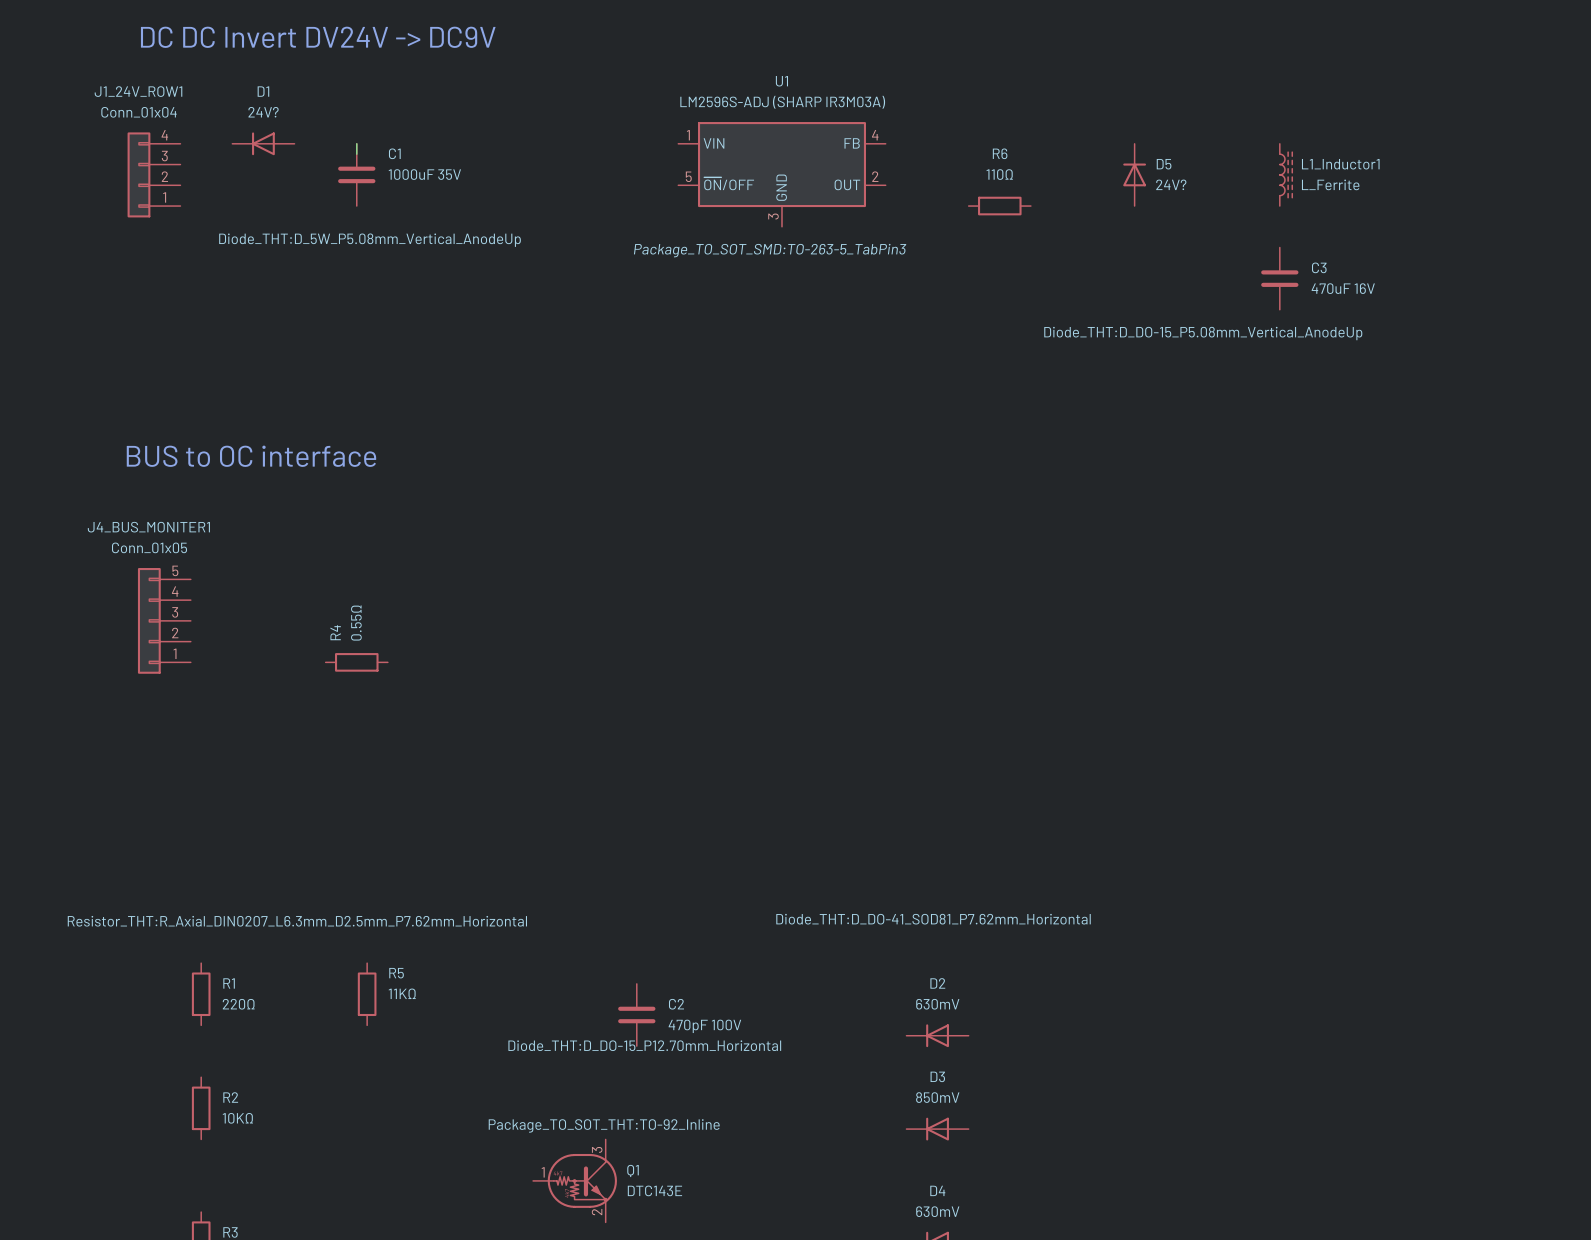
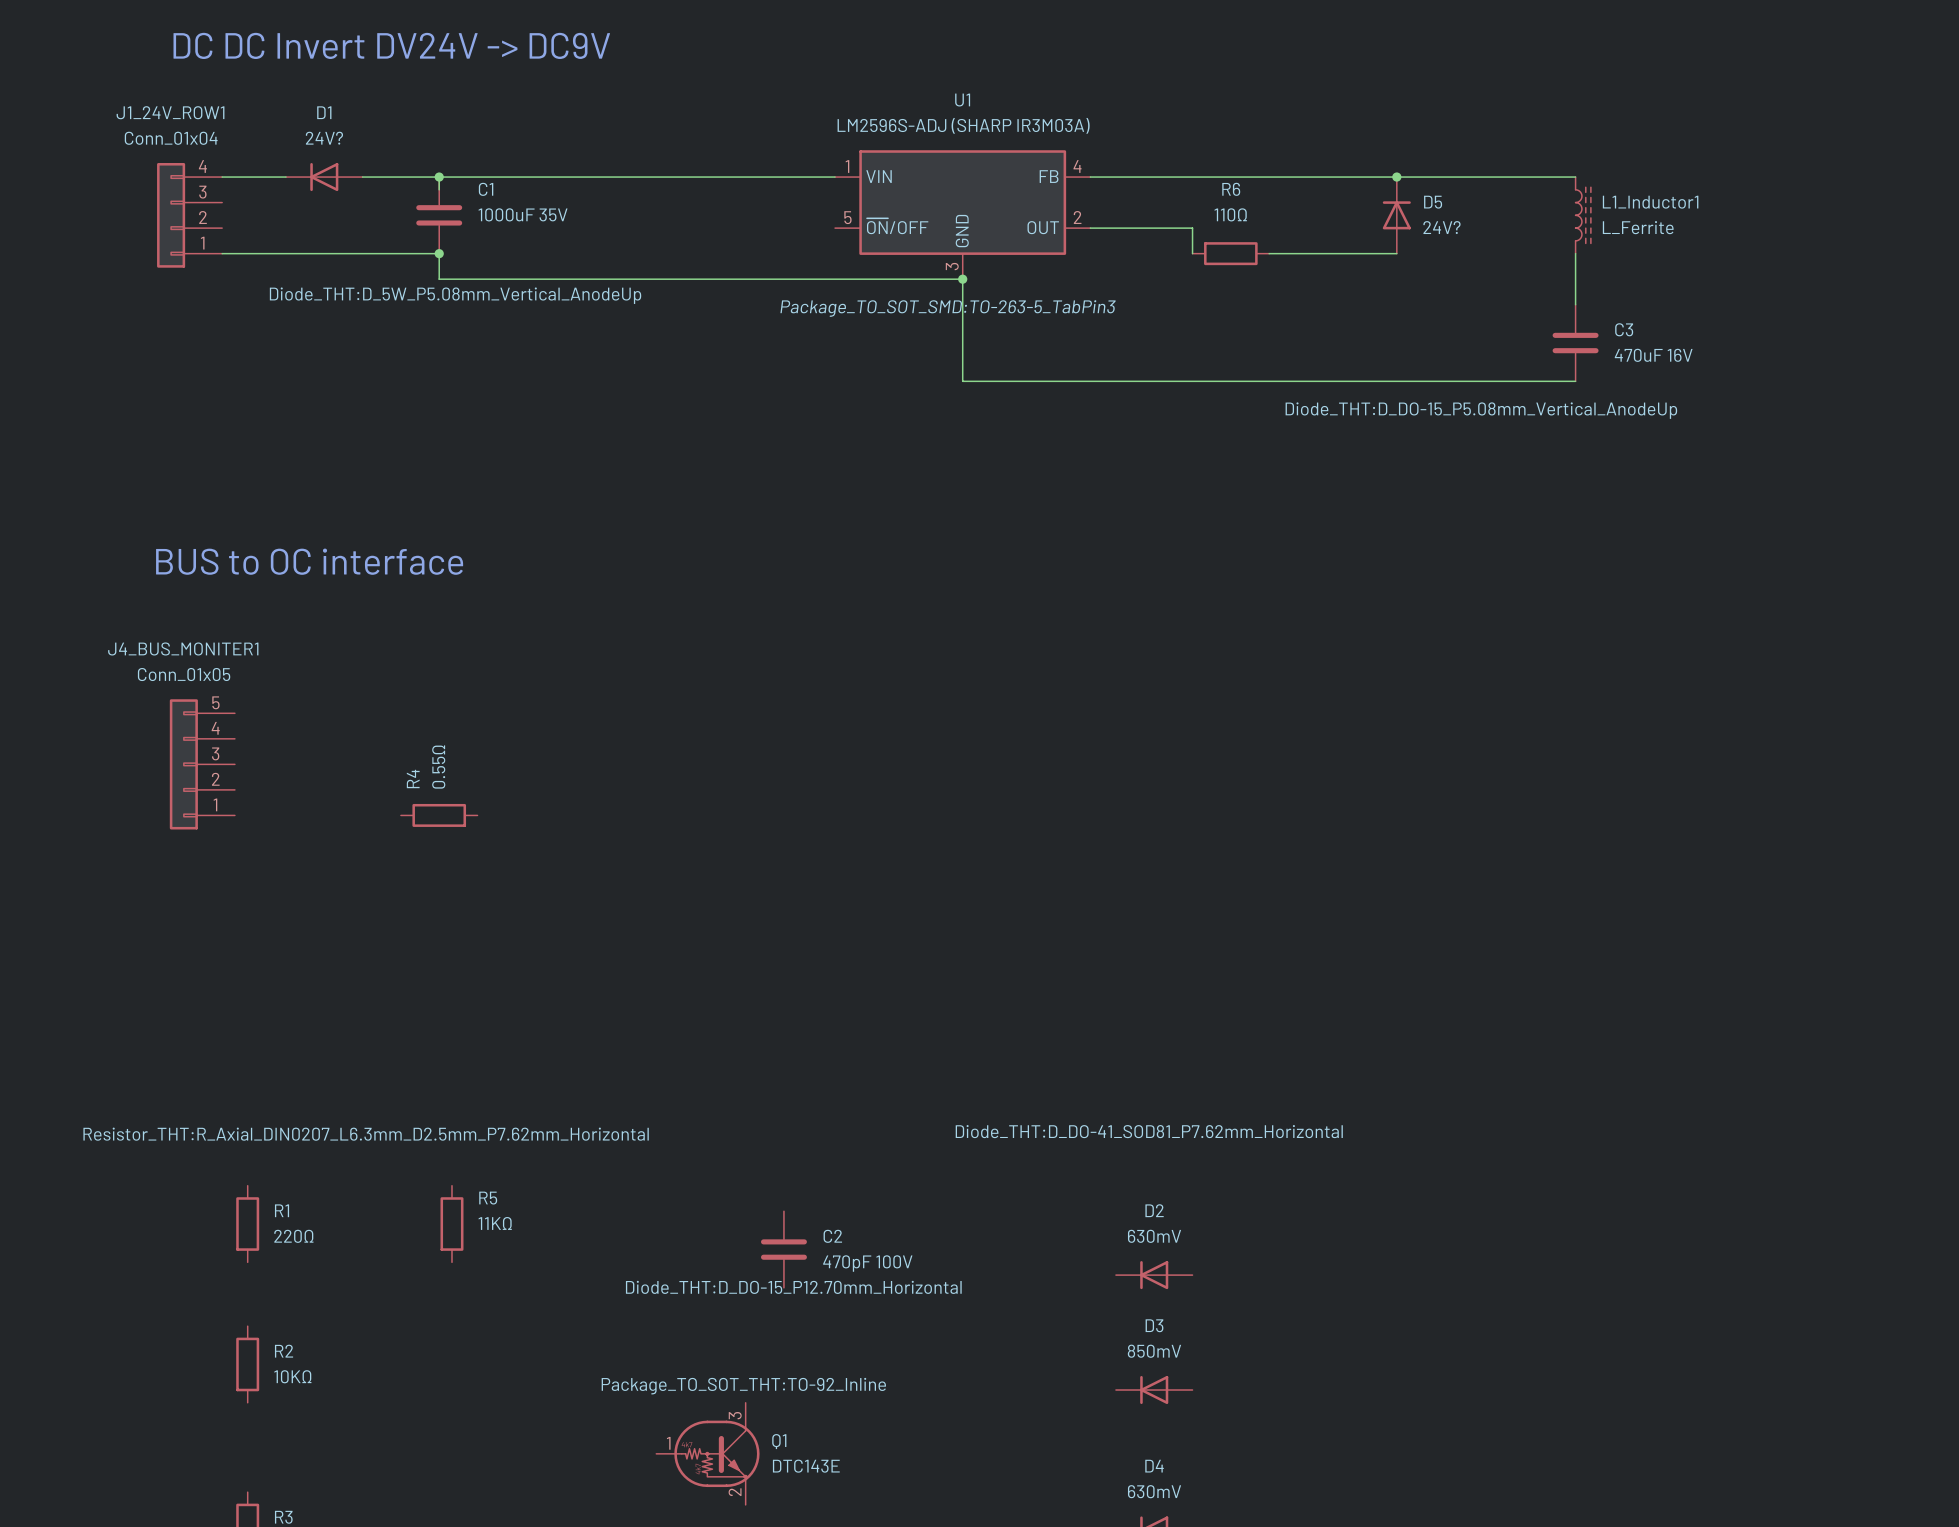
wire: none -> (222, 177) (286, 177)
wire: none -> (362, 177) (835, 177)
junction: none -> (439, 177)
wire: none -> (1090, 177) (1575, 177)
junction: none -> (1396, 177)
wire: none -> (1090, 228) (1192, 228) (1192, 253)
wire: none -> (222, 253) (439, 253) (439, 279) (962, 279) (962, 381) (1575, 381)
junction: none -> (439, 253)
wire: none -> (1269, 253) (1396, 253)
wire: none -> (1575, 253) (1575, 304)
junction: none -> (962, 279)

